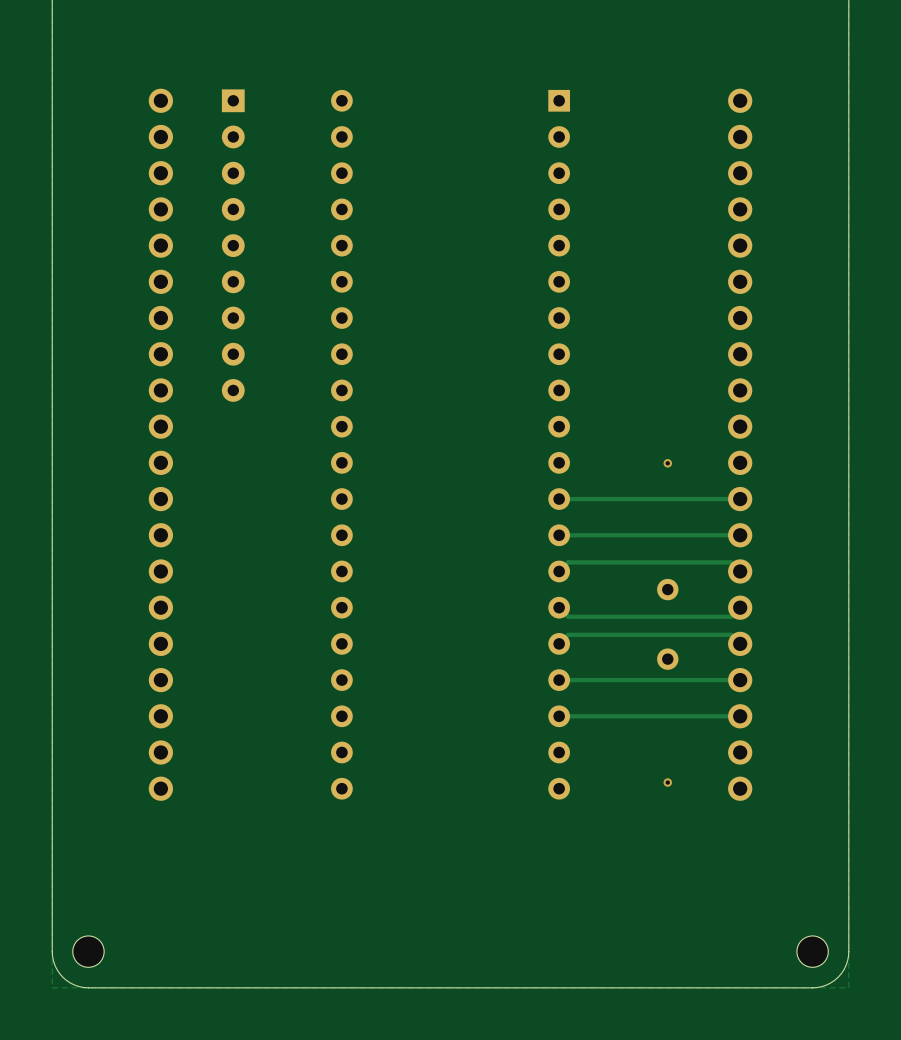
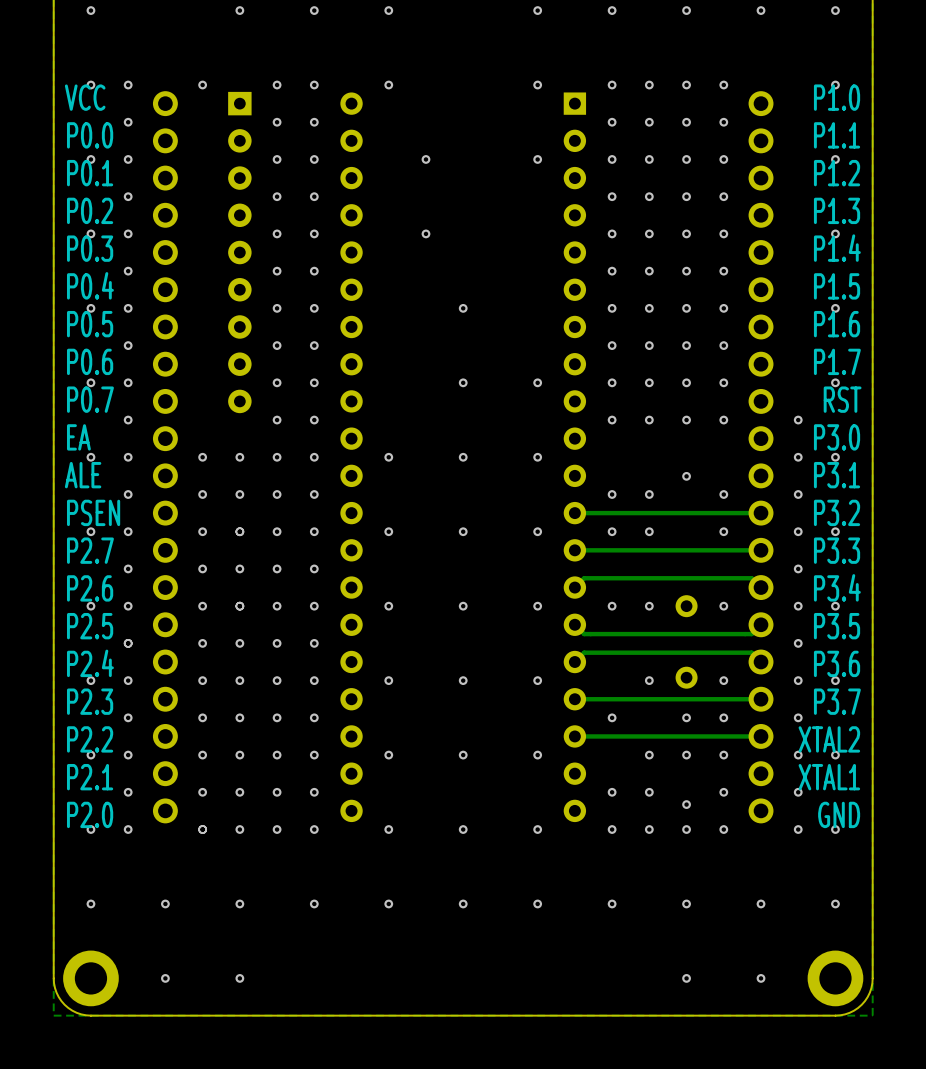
via: none -> (90, 10)
via: none -> (239, 10)
via: none -> (314, 10)
via: none -> (388, 10)
via: none -> (537, 10)
via: none -> (612, 10)
via: none -> (686, 10)
via: none -> (761, 10)
via: none -> (835, 10)
via: none -> (90, 85)
via: none -> (128, 85)
via: none -> (202, 85)
via: none -> (277, 85)
via: none -> (314, 85)
via: none -> (388, 85)
via: none -> (537, 85)
via: none -> (612, 85)
via: none -> (649, 85)
via: none -> (686, 85)
via: none -> (723, 85)
via: none -> (835, 85)
text: none -> VCC (85, 97)
text: none -> P1.0 (837, 97)
via: none -> (128, 122)
via: none -> (277, 122)
via: none -> (314, 122)
via: none -> (612, 122)
via: none -> (649, 122)
via: none -> (686, 122)
via: none -> (723, 122)
text: none -> P0.0 (90, 135)
text: none -> P1.1 (837, 135)
via: none -> (90, 159)
via: none -> (128, 159)
via: none -> (277, 159)
via: none -> (314, 159)
via: none -> (425, 159)
via: none -> (537, 159)
via: none -> (612, 159)
via: none -> (649, 159)
via: none -> (686, 159)
via: none -> (723, 159)
via: none -> (835, 159)
text: none -> P0.1 (90, 173)
text: none -> P1.2 (837, 173)
via: none -> (128, 196)
via: none -> (277, 196)
via: none -> (314, 196)
via: none -> (612, 196)
via: none -> (649, 196)
via: none -> (686, 196)
via: none -> (723, 196)
text: none -> P0.2 (90, 210)
text: none -> P1.3 (837, 210)
via: none -> (90, 233)
via: none -> (128, 233)
via: none -> (277, 233)
via: none -> (314, 233)
via: none -> (425, 233)
via: none -> (612, 233)
via: none -> (649, 233)
via: none -> (686, 233)
via: none -> (723, 233)
via: none -> (835, 233)
text: none -> P0.3 (90, 248)
text: none -> P1.4 (837, 248)
via: none -> (128, 271)
via: none -> (277, 271)
via: none -> (314, 271)
via: none -> (612, 271)
via: none -> (649, 271)
via: none -> (686, 271)
via: none -> (723, 271)
text: none -> P0.4 (90, 285)
text: none -> P1.5 (837, 286)
via: none -> (90, 308)
via: none -> (128, 308)
via: none -> (277, 308)
via: none -> (314, 308)
via: none -> (463, 308)
via: none -> (612, 308)
via: none -> (649, 308)
via: none -> (686, 308)
via: none -> (723, 308)
via: none -> (835, 308)
text: none -> P0.5 (90, 324)
text: none -> P1.6 (837, 324)
via: none -> (128, 345)
via: none -> (277, 345)
via: none -> (314, 345)
via: none -> (612, 345)
via: none -> (649, 345)
via: none -> (686, 345)
via: none -> (723, 345)
text: none -> P0.6 (90, 361)
text: none -> P1.7 (837, 361)
via: none -> (90, 382)
via: none -> (128, 382)
via: none -> (277, 382)
via: none -> (314, 382)
via: none -> (463, 382)
via: none -> (537, 382)
via: none -> (612, 382)
via: none -> (649, 382)
via: none -> (686, 382)
via: none -> (723, 382)
via: none -> (835, 382)
text: none -> P0.7 (90, 399)
text: none -> RST (842, 399)
via: none -> (128, 420)
via: none -> (277, 420)
via: none -> (314, 420)
via: none -> (612, 420)
via: none -> (649, 420)
via: none -> (686, 420)
via: none -> (723, 420)
via: none -> (798, 420)
text: none -> EA (78, 437)
text: none -> P3.0 (837, 437)
via: none -> (90, 457)
via: none -> (128, 457)
via: none -> (202, 457)
via: none -> (239, 457)
via: none -> (277, 457)
via: none -> (314, 457)
via: none -> (388, 457)
via: none -> (463, 457)
via: none -> (537, 457)
via: none -> (798, 457)
via: none -> (835, 457)
text: none -> ALE (83, 475)
text: none -> P3.1 (837, 475)
via: none -> (128, 494)
via: none -> (202, 494)
via: none -> (239, 494)
via: none -> (277, 494)
via: none -> (314, 494)
via: none -> (612, 494)
via: none -> (649, 494)
via: none -> (723, 494)
via: none -> (798, 494)
text: none -> PSEN (93, 512)
text: none -> P3.2 (837, 512)
via: none -> (90, 531)
via: none -> (128, 531)
via: none -> (202, 531)
via: none -> (239, 531)
via: none -> (277, 531)
via: none -> (314, 531)
via: none -> (388, 531)
via: none -> (463, 531)
via: none -> (537, 531)
via: none -> (612, 531)
via: none -> (649, 531)
via: none -> (723, 531)
via: none -> (798, 531)
via: none -> (835, 531)
text: none -> P2.7 (90, 550)
text: none -> P3.3 (837, 550)
via: none -> (128, 568)
via: none -> (202, 568)
via: none -> (239, 568)
via: none -> (277, 568)
via: none -> (314, 568)
via: none -> (798, 568)
text: none -> P3.4 (837, 587)
text: none -> P2.6 (90, 588)
via: none -> (90, 606)
via: none -> (128, 606)
via: none -> (202, 606)
via: none -> (239, 606)
via: none -> (277, 606)
via: none -> (314, 606)
via: none -> (388, 606)
via: none -> (463, 606)
via: none -> (537, 606)
via: none -> (612, 606)
via: none -> (649, 606)
via: none -> (723, 606)
via: none -> (798, 606)
via: none -> (835, 606)
text: none -> P2.5 (90, 626)
text: none -> P3.5 (837, 626)
via: none -> (128, 643)
via: none -> (202, 643)
via: none -> (239, 643)
via: none -> (277, 643)
via: none -> (314, 643)
via: none -> (798, 643)
text: none -> P2.4 (90, 663)
text: none -> P3.6 (837, 663)
via: none -> (90, 680)
via: none -> (128, 680)
via: none -> (202, 680)
via: none -> (239, 680)
via: none -> (277, 680)
via: none -> (314, 680)
via: none -> (388, 680)
via: none -> (463, 680)
via: none -> (537, 680)
via: none -> (649, 680)
via: none -> (723, 680)
via: none -> (798, 680)
via: none -> (835, 680)
text: none -> P2.3 (90, 701)
text: none -> P3.7 (837, 701)
via: none -> (128, 717)
via: none -> (202, 717)
via: none -> (239, 717)
via: none -> (277, 717)
via: none -> (314, 717)
via: none -> (612, 717)
via: none -> (686, 717)
via: none -> (723, 717)
via: none -> (798, 717)
text: none -> P2.2 (90, 739)
text: none -> XTAL2 (829, 739)
via: none -> (90, 755)
via: none -> (128, 755)
via: none -> (202, 755)
via: none -> (239, 755)
via: none -> (277, 755)
via: none -> (314, 755)
via: none -> (388, 755)
via: none -> (463, 755)
via: none -> (537, 755)
via: none -> (649, 755)
via: none -> (686, 755)
via: none -> (723, 755)
via: none -> (798, 755)
via: none -> (835, 755)
text: none -> P2.1 (90, 777)
text: none -> XTAL1 (829, 777)
via: none -> (128, 792)
via: none -> (202, 792)
via: none -> (239, 792)
via: none -> (277, 792)
via: none -> (314, 792)
via: none -> (612, 792)
via: none -> (649, 792)
via: none -> (723, 792)
via: none -> (798, 792)
text: none -> P2.0 (90, 814)
text: none -> GND (839, 814)
via: none -> (90, 829)
via: none -> (128, 829)
via: none -> (202, 829)
via: none -> (239, 829)
via: none -> (277, 829)
via: none -> (314, 829)
via: none -> (388, 829)
via: none -> (463, 829)
via: none -> (537, 829)
via: none -> (612, 829)
via: none -> (649, 829)
via: none -> (686, 829)
via: none -> (723, 829)
via: none -> (798, 829)
via: none -> (835, 829)
via: none -> (90, 903)
via: none -> (165, 903)
via: none -> (239, 903)
via: none -> (314, 903)
via: none -> (388, 903)
via: none -> (463, 903)
via: none -> (537, 903)
via: none -> (612, 903)
via: none -> (686, 903)
via: none -> (761, 903)
via: none -> (835, 903)
part footprint: [72, 935, 105, 968] -> [63, 950, 119, 1007]
part footprint: [796, 935, 829, 968] -> [807, 950, 864, 1007]
via: none -> (165, 978)
via: none -> (239, 978)
via: none -> (686, 978)
via: none -> (761, 978)

